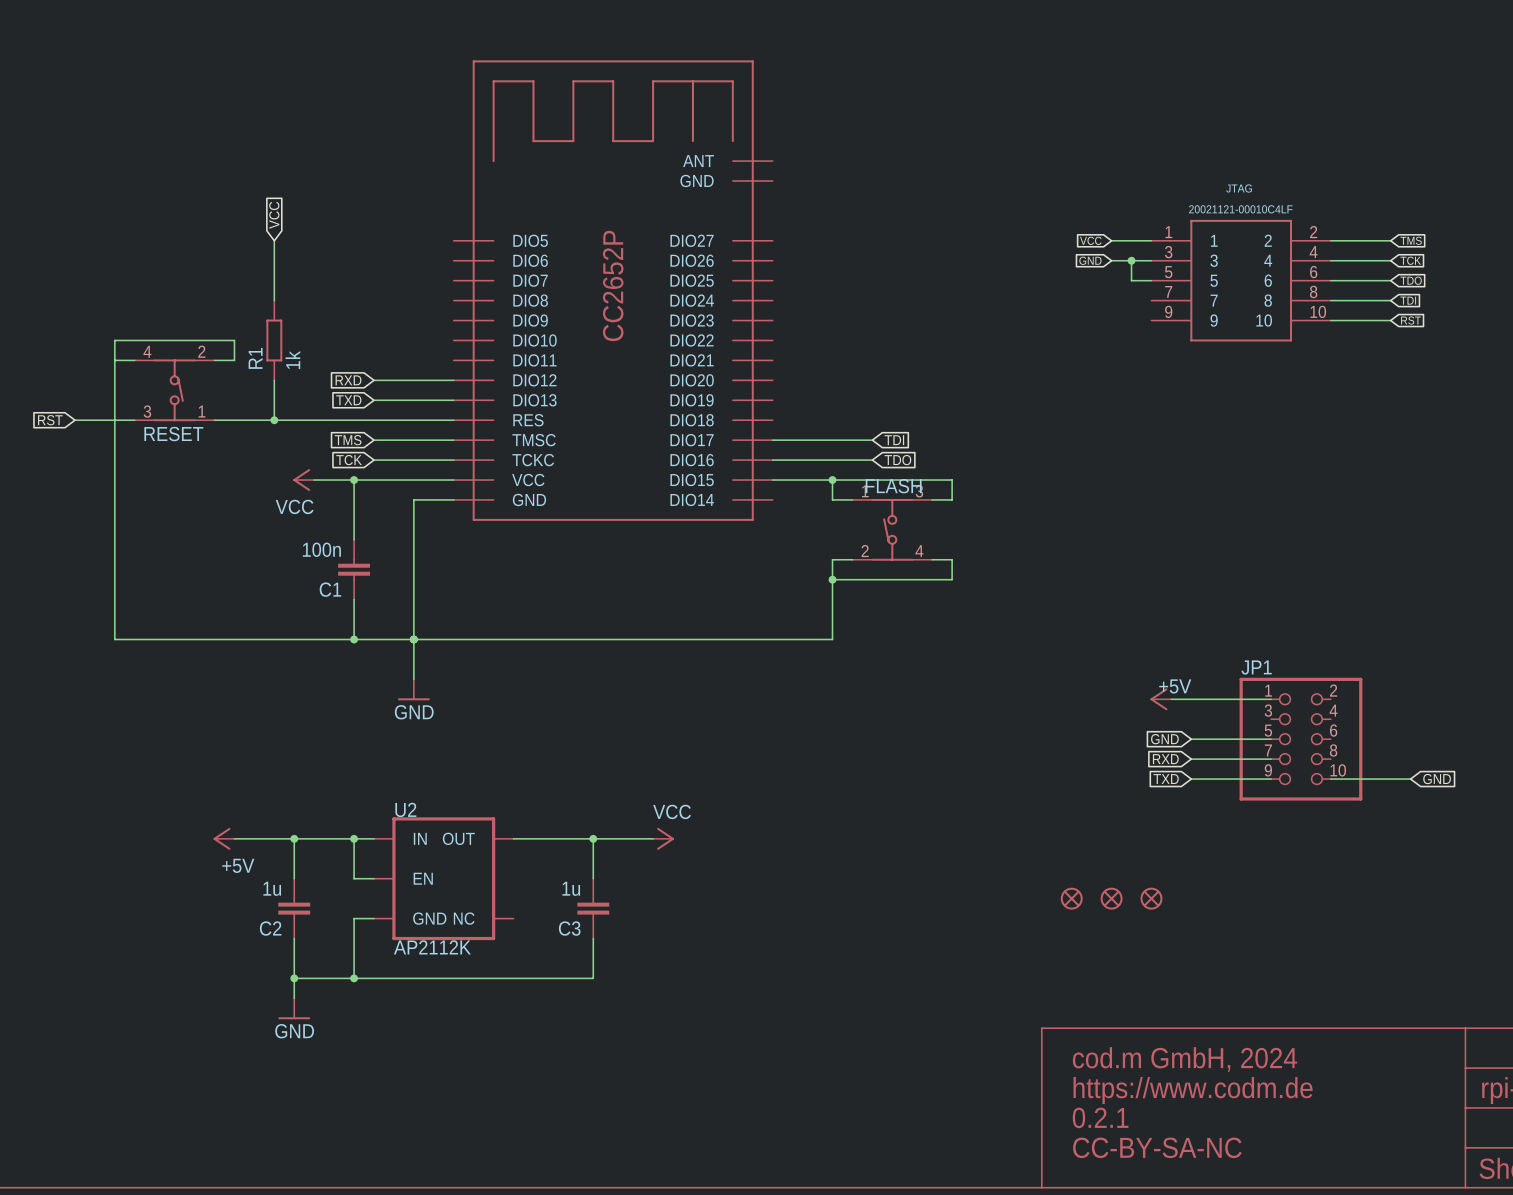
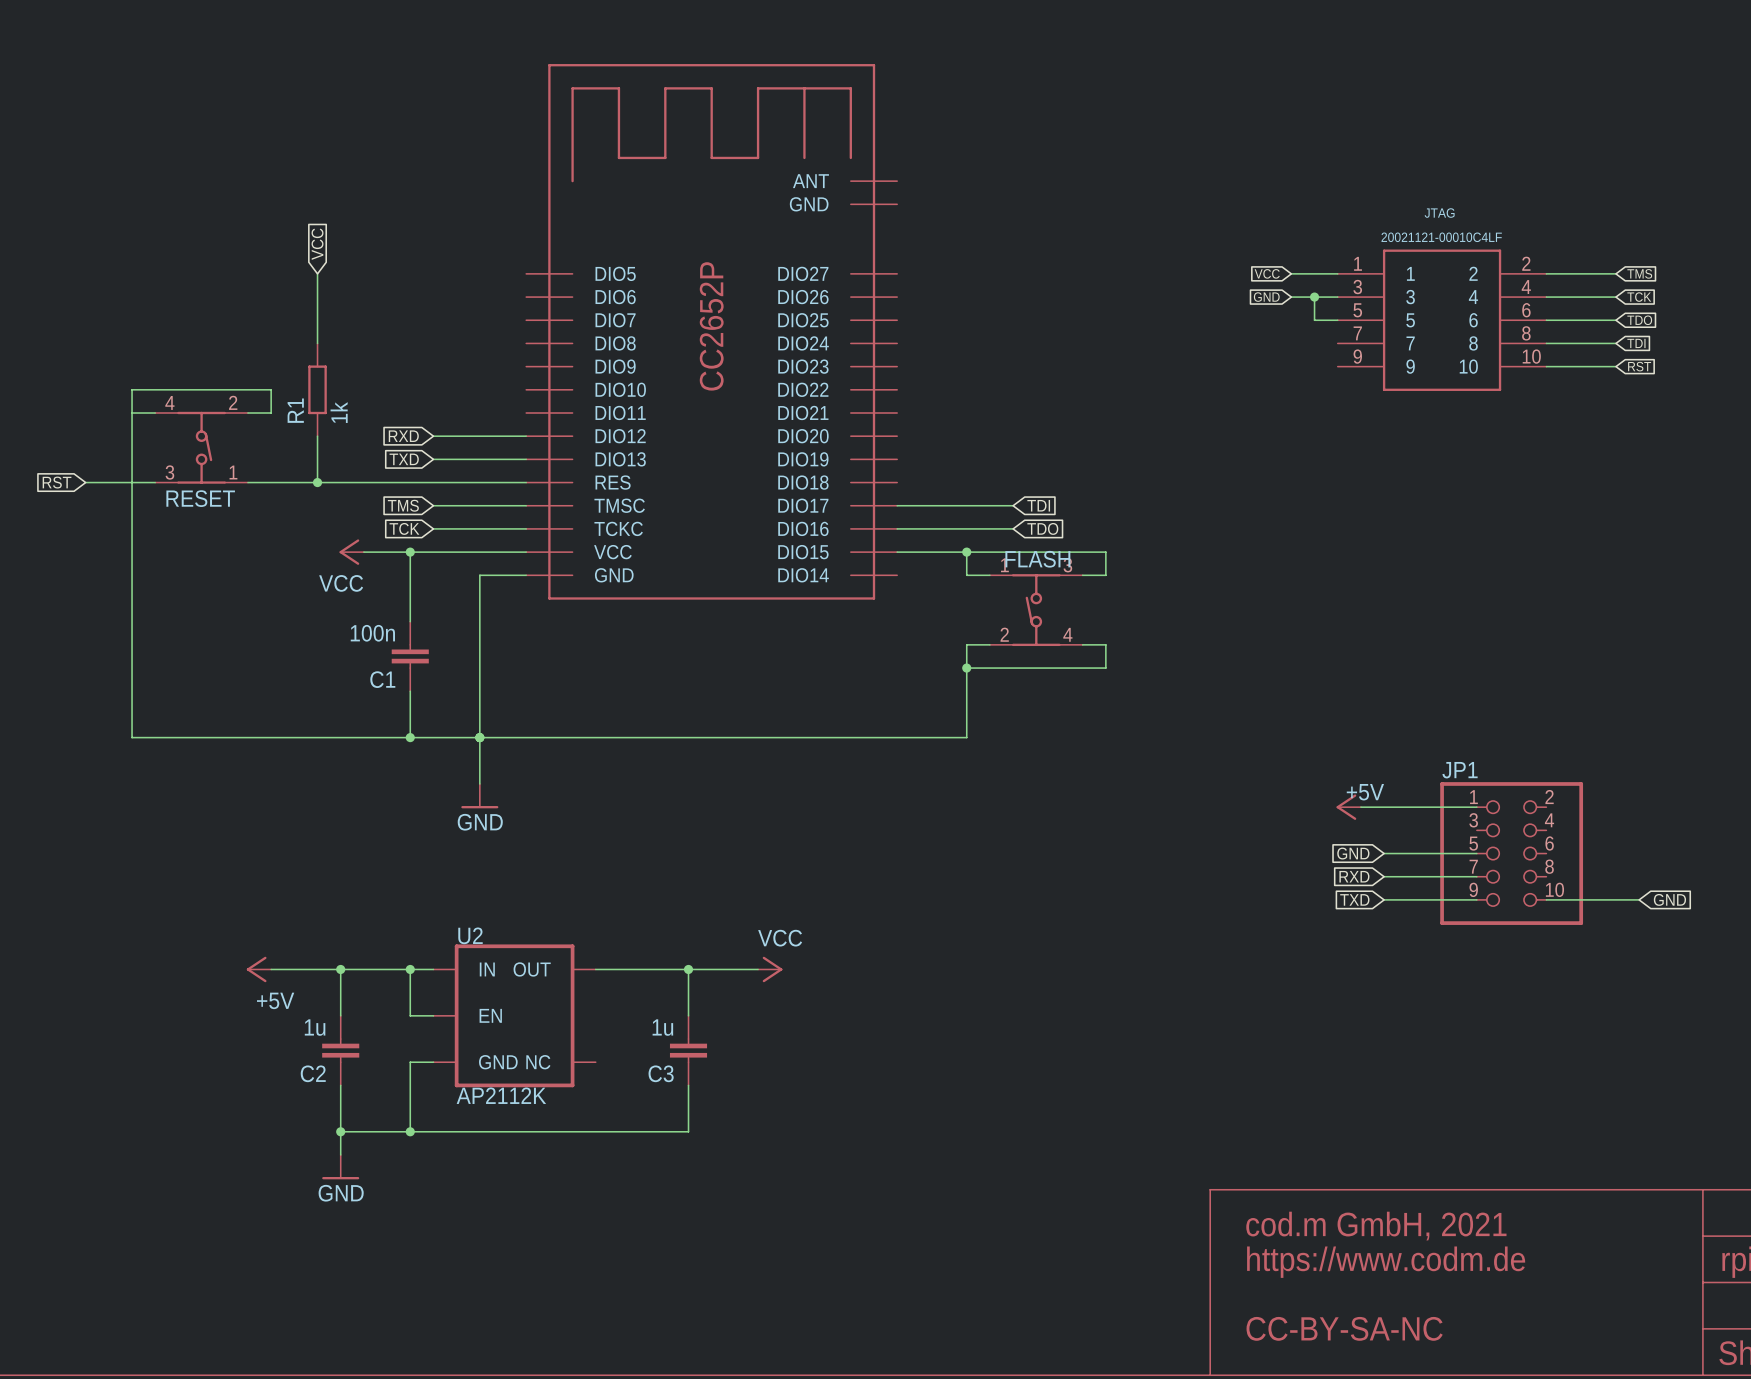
part: (1071, 898) -> none
part: (1111, 898) -> none
part: (1151, 898) -> none
text: cod.m GmbH, 2024 (1184, 1059) -> cod.m GmbH, 2021 (1376, 1226)
text: 0.2.1 (1100, 1117) -> none

